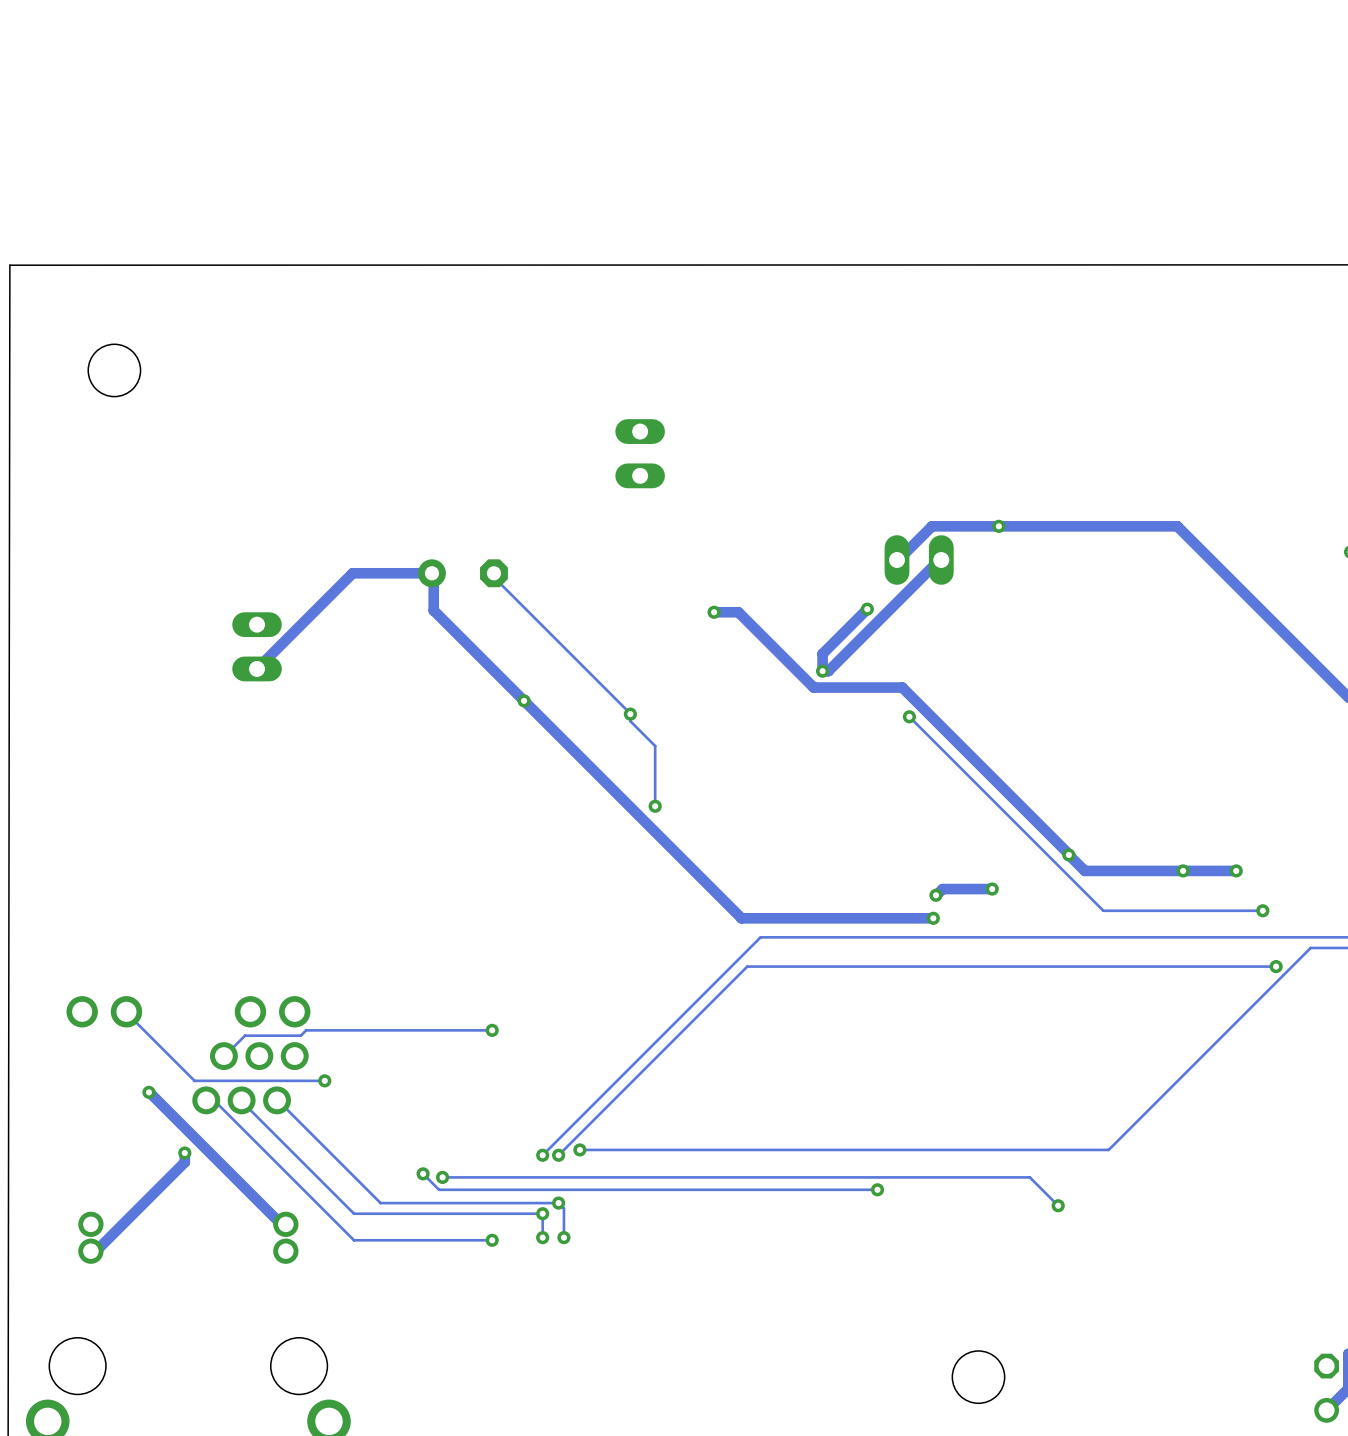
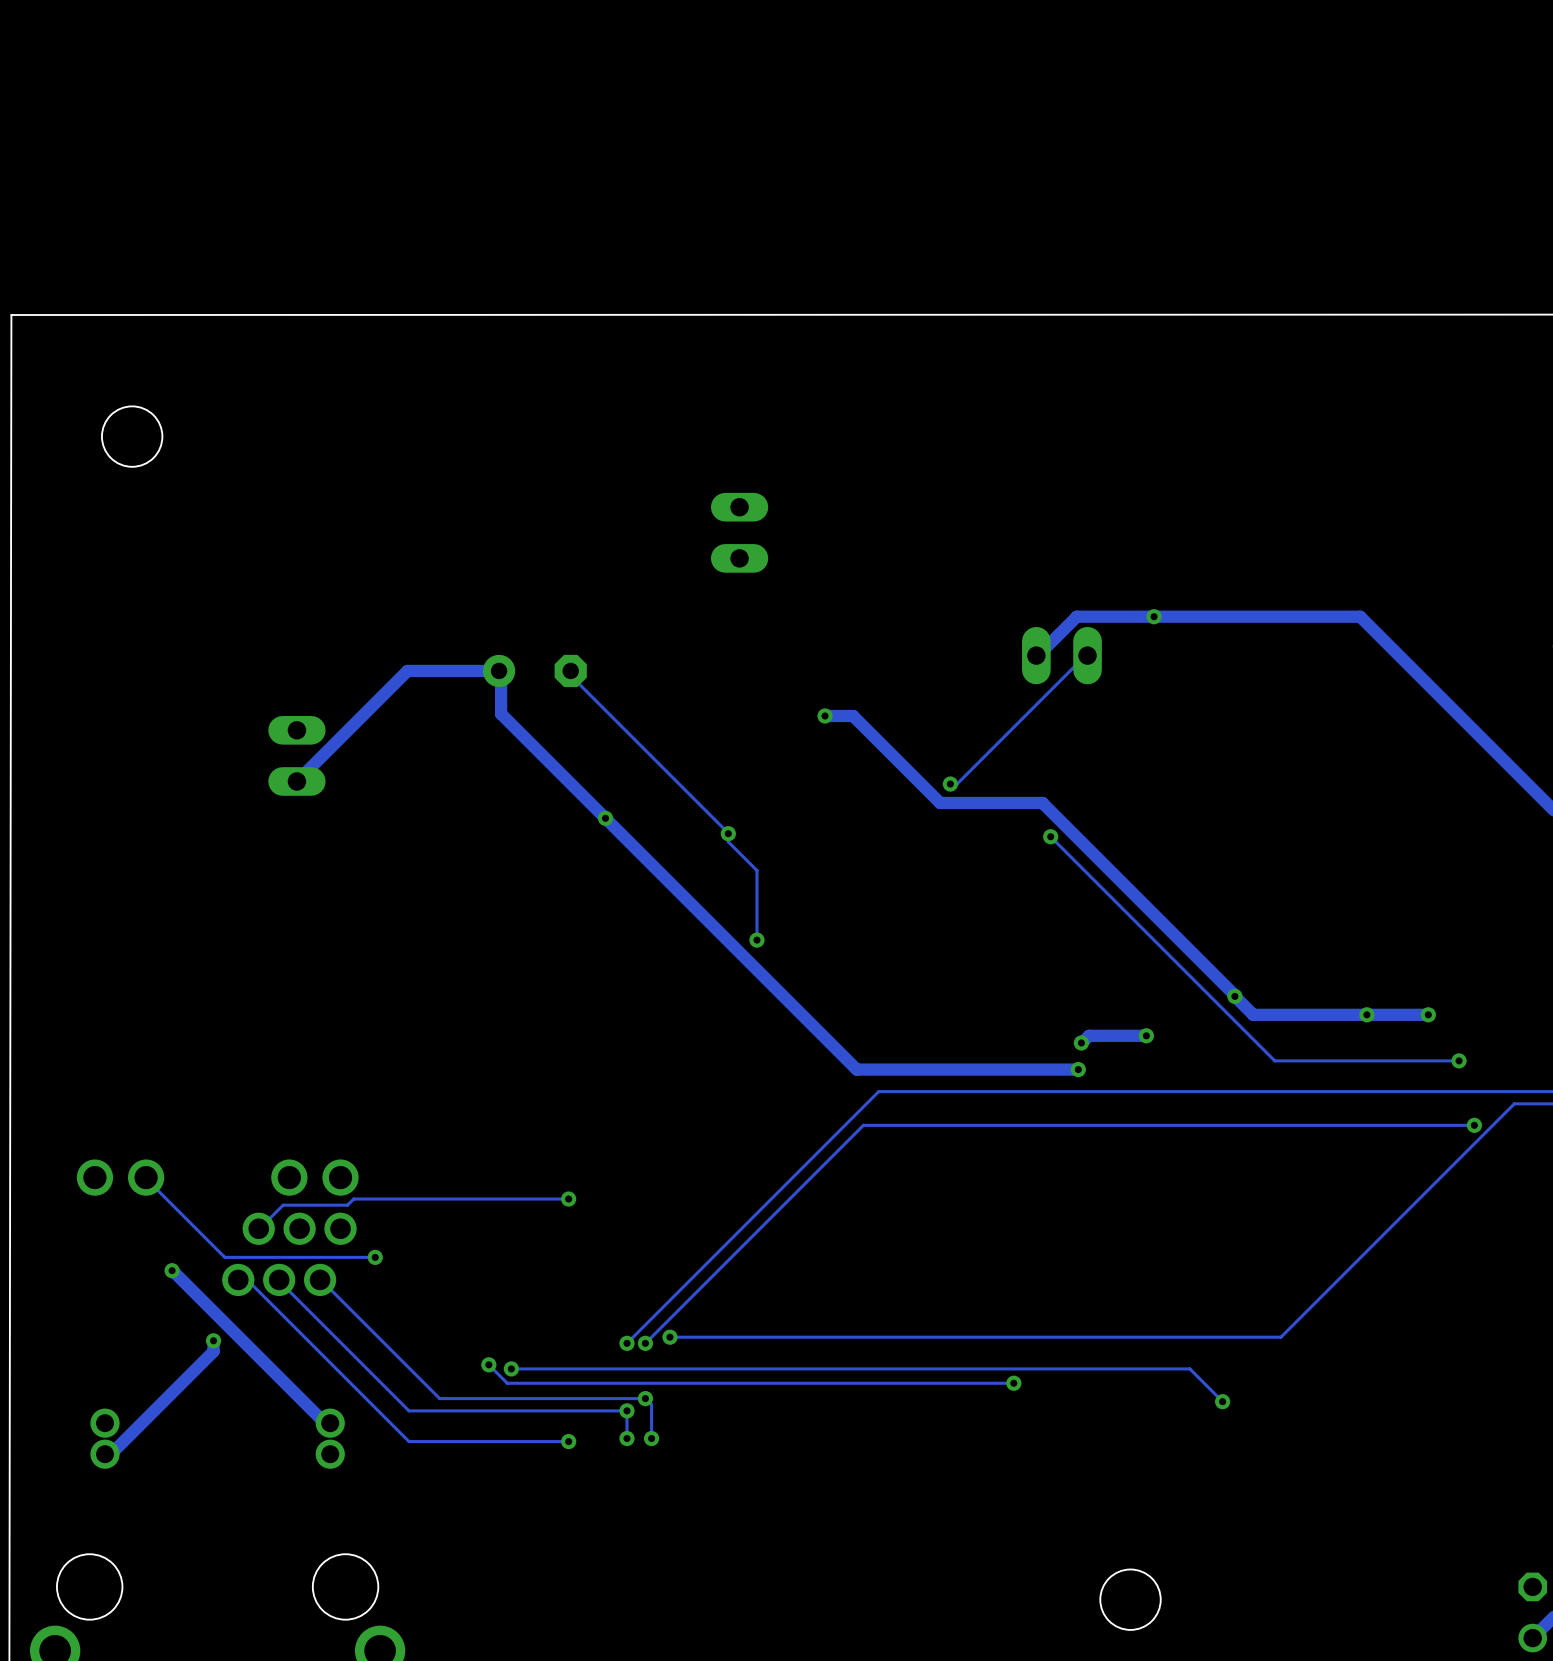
track width: thick (939, 560) (828, 671) (822, 671) -> thin (1085, 655) (957, 784) (950, 784)
track: (867, 609) (822, 653) (822, 671) -> none
via: (867, 609) -> none

